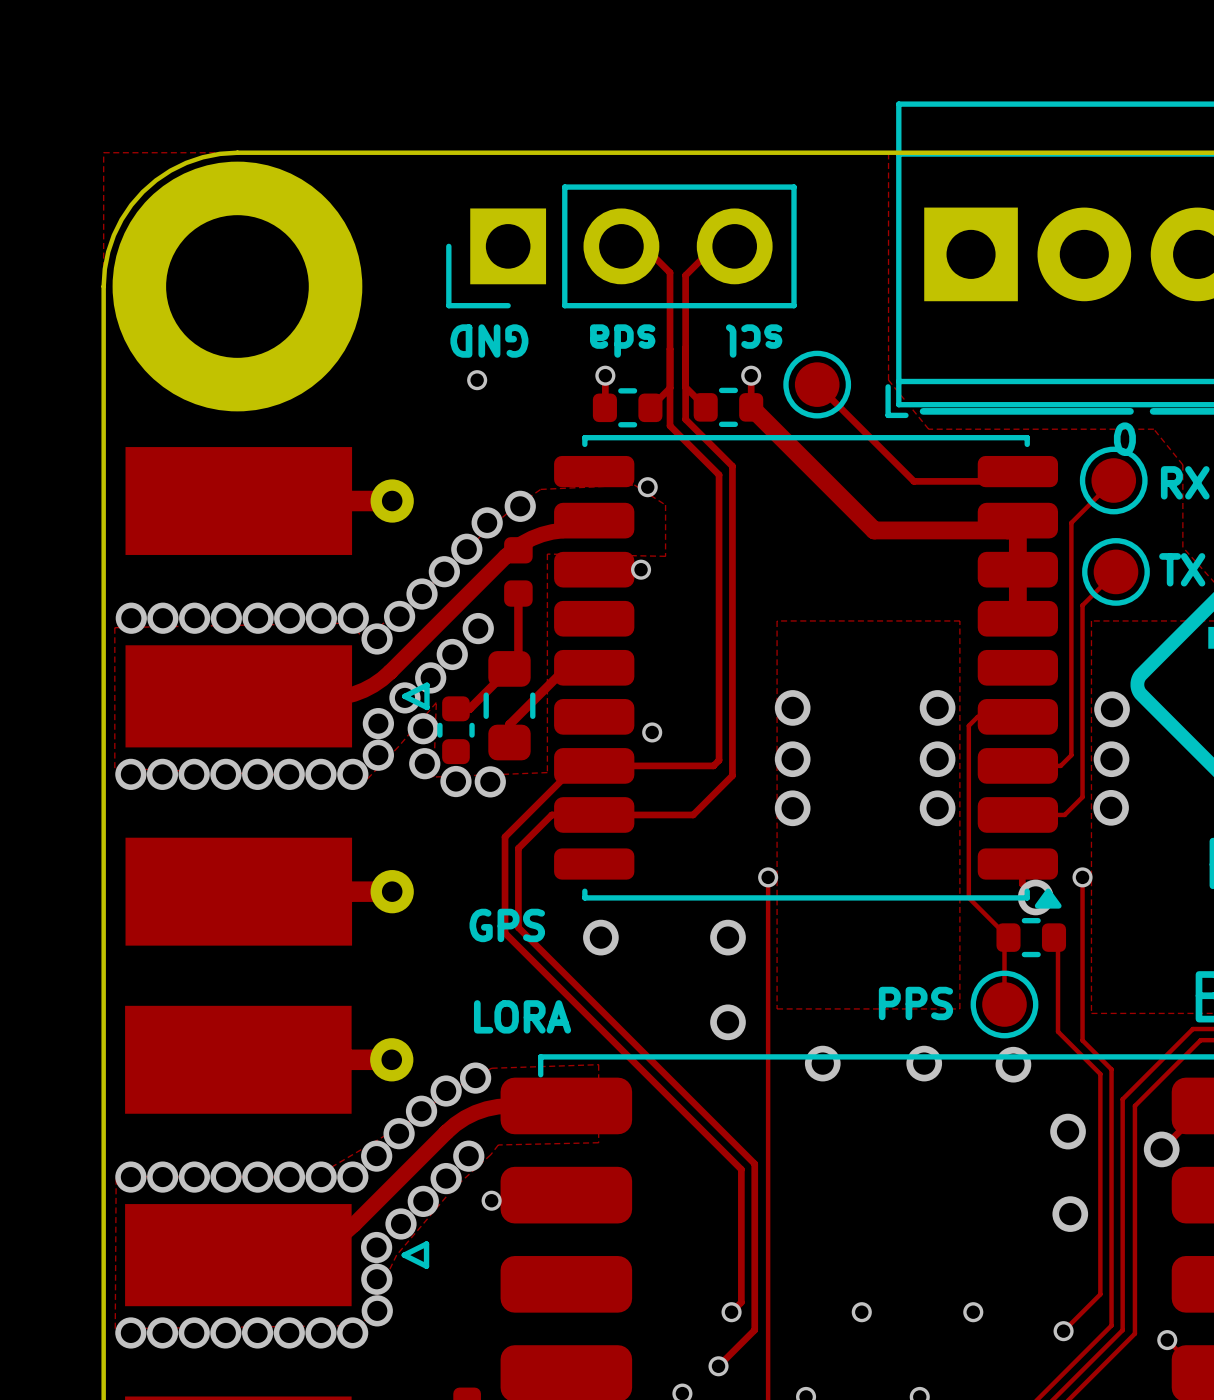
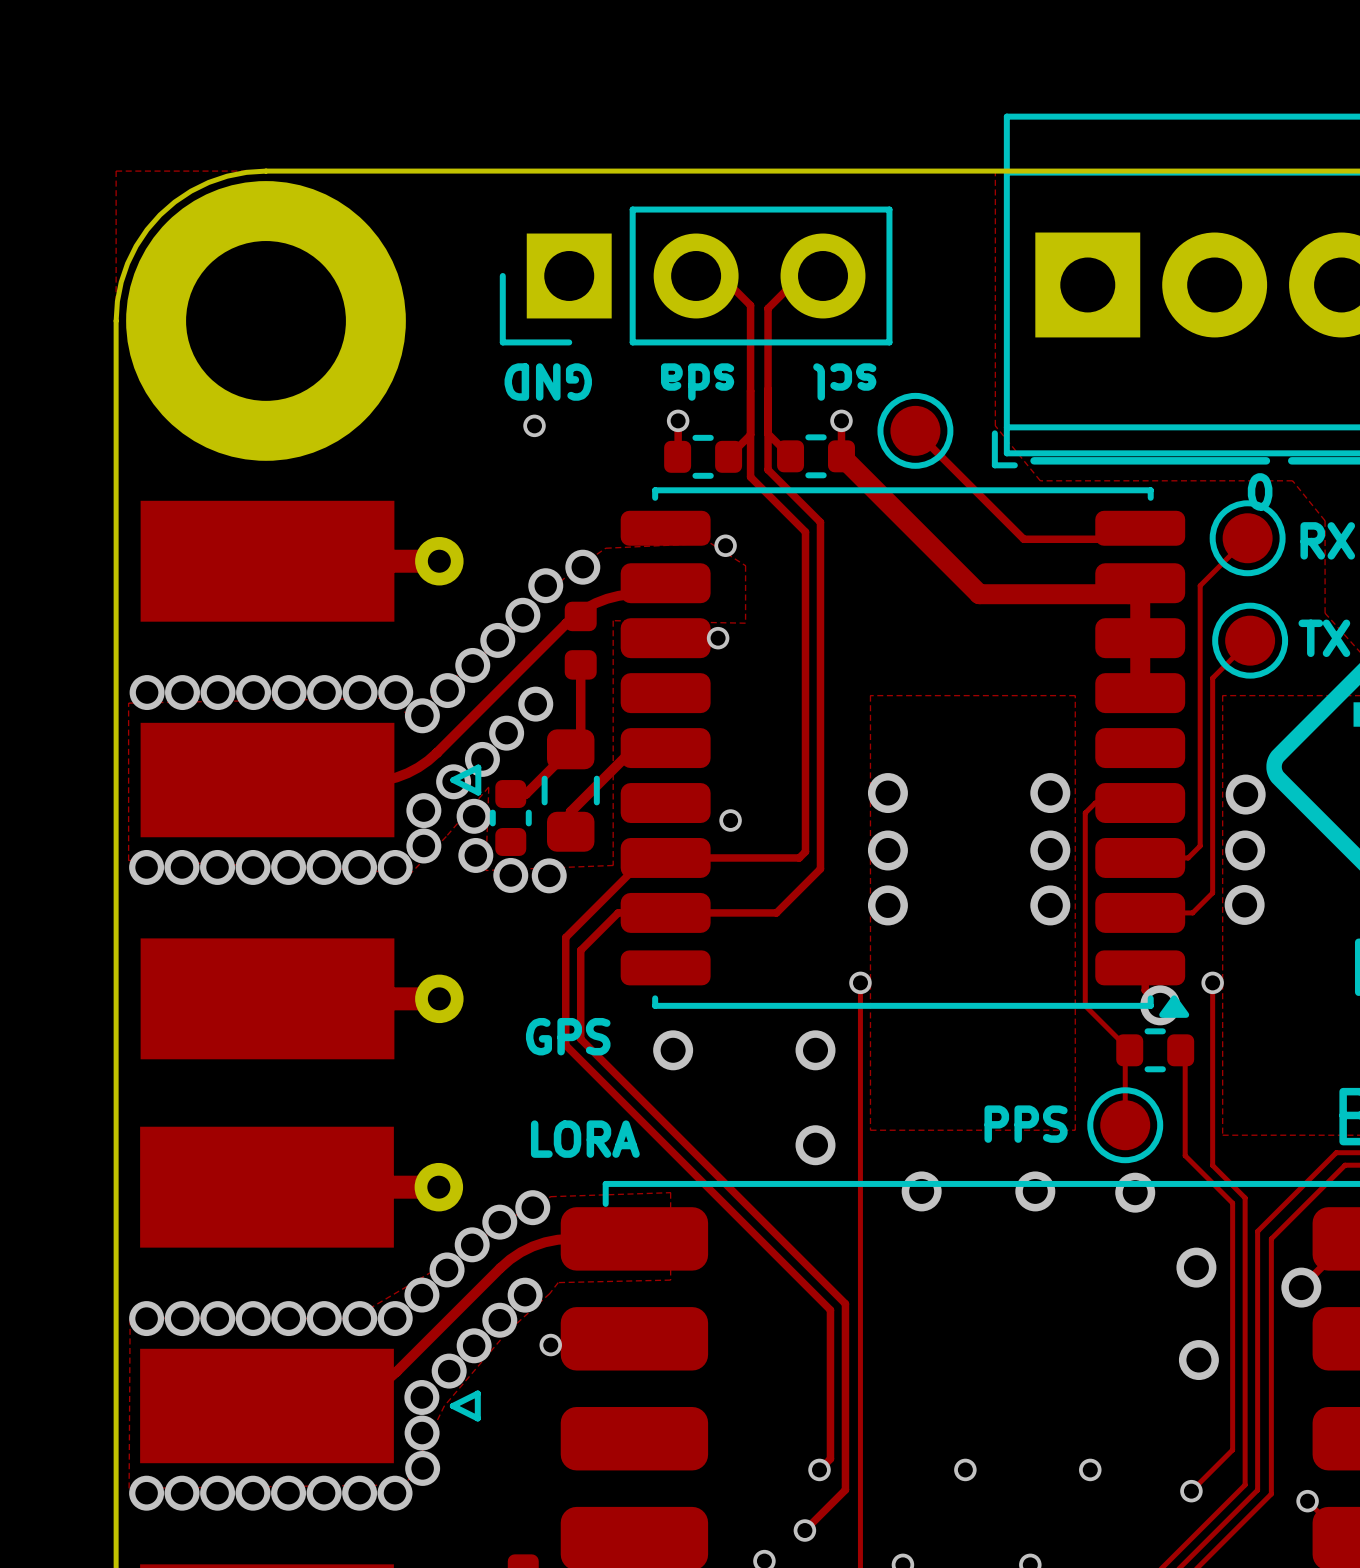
track width: thick (562, 530) (531, 538) (513, 549) (382, 679) (353, 694) (333, 698) -> thin (630, 594) (595, 603) (575, 615) (428, 760) (396, 777) (373, 781)
track width: thick (509, 1105) (486, 1108) (475, 1112) (455, 1124) (346, 1231) (327, 1242) (296, 1250) -> thin (570, 1238) (545, 1242) (532, 1246) (510, 1259) (387, 1379) (367, 1392) (332, 1400)

